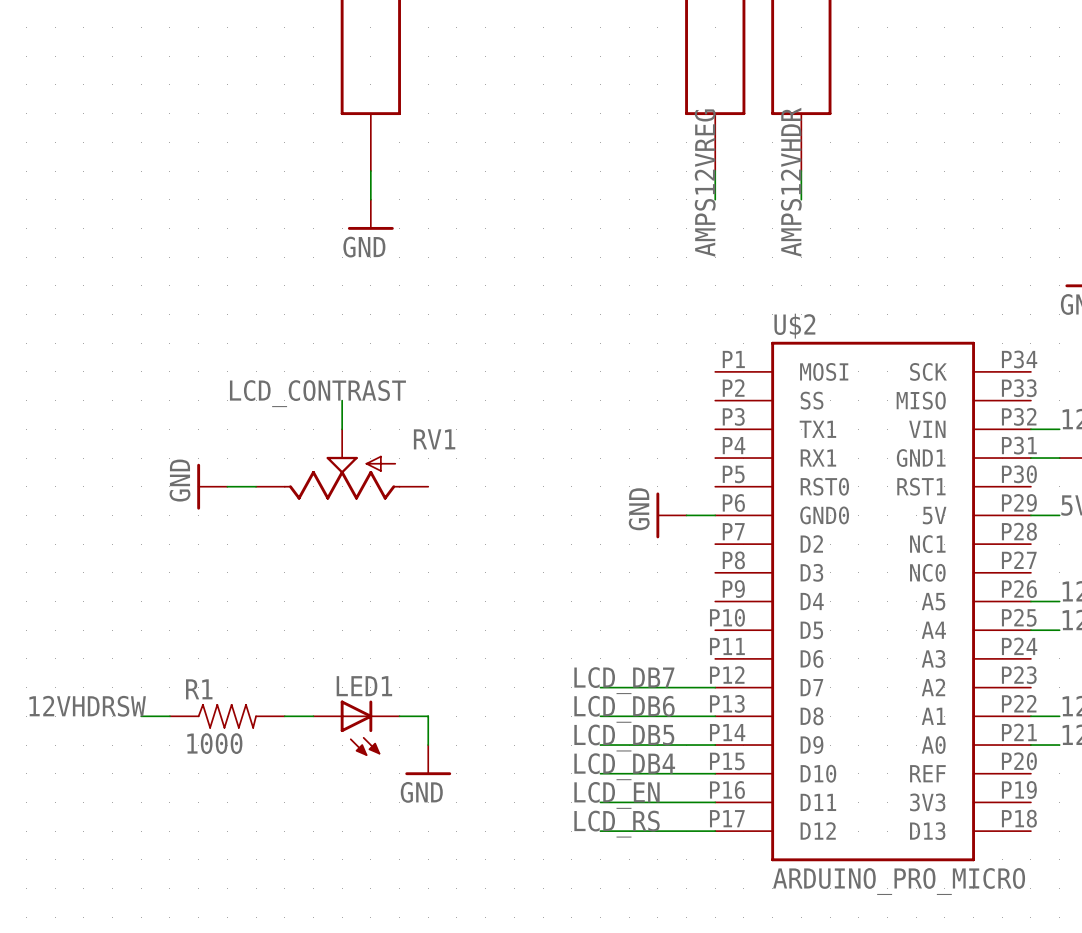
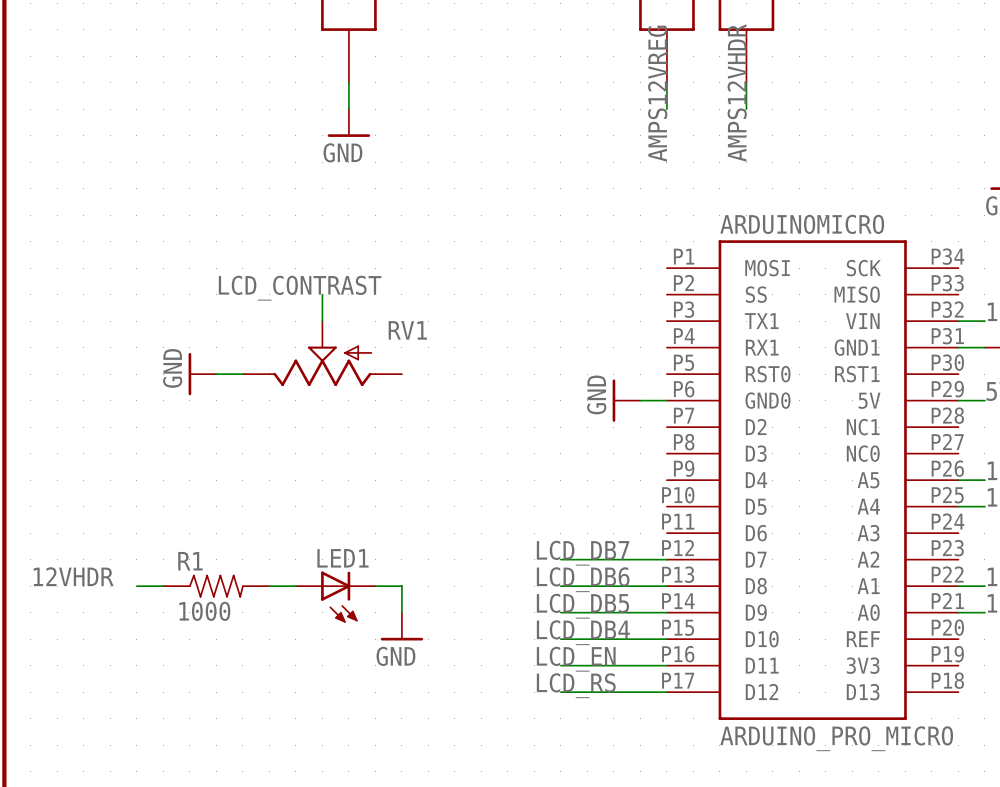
U$2 name: U$2 (794, 326) -> ARDUINOMICRO (802, 224)
label: 12VHDRSW (87, 706) -> 12VHDR (73, 576)

